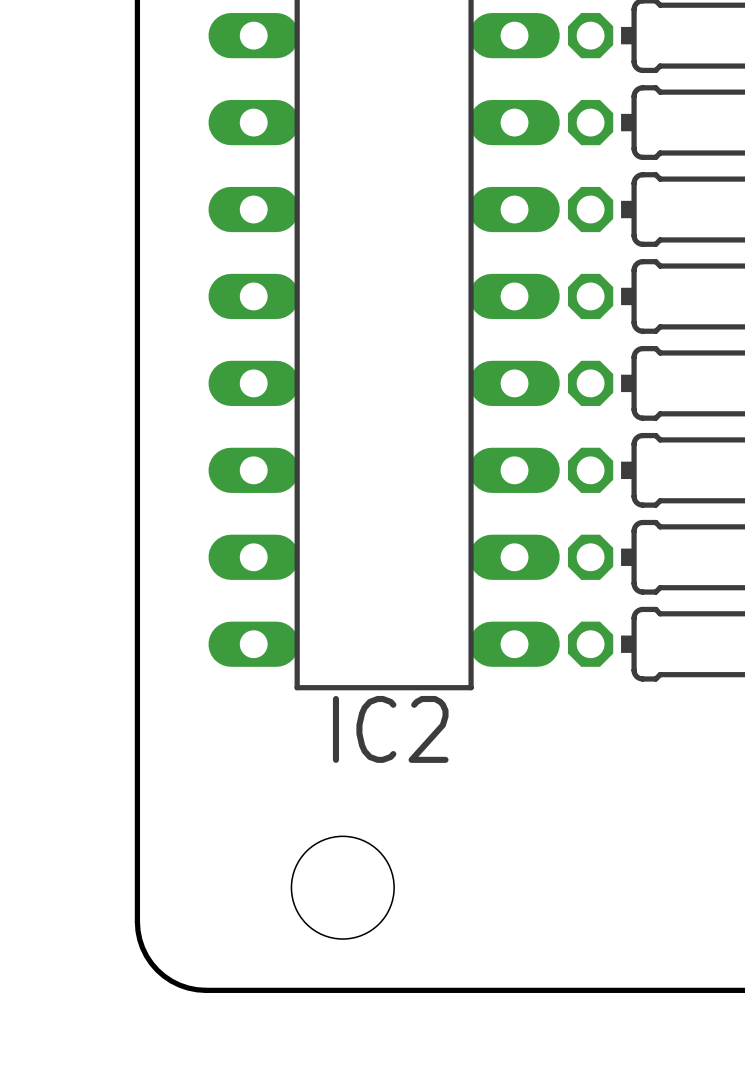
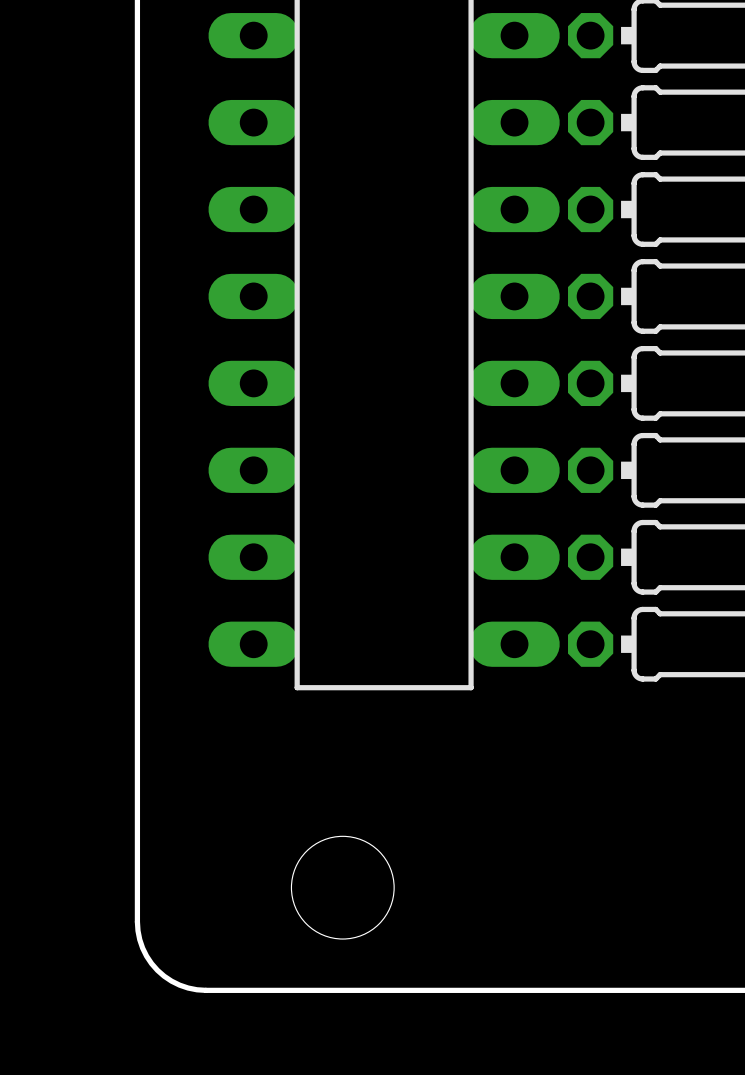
IC2 name: IC2 (390, 729) -> none

